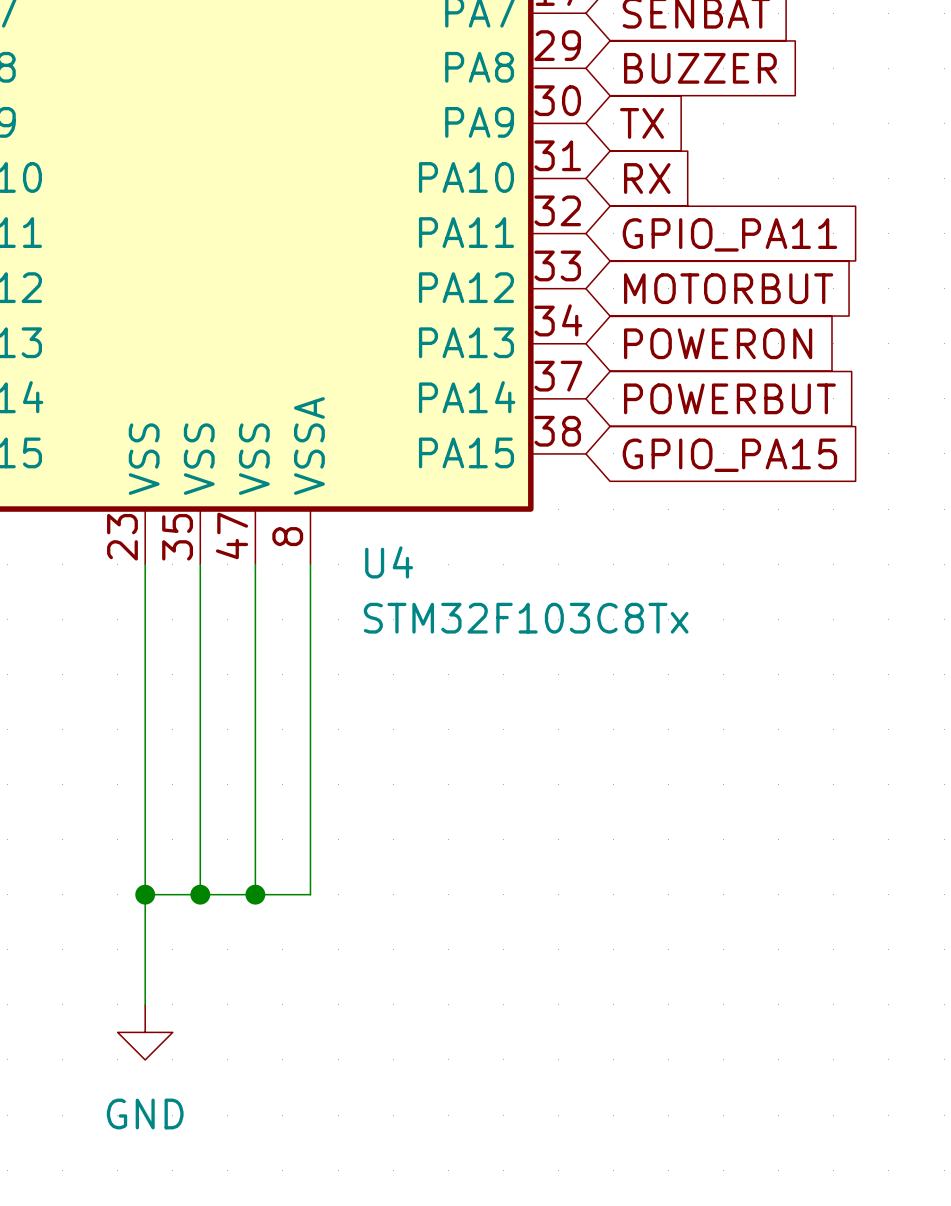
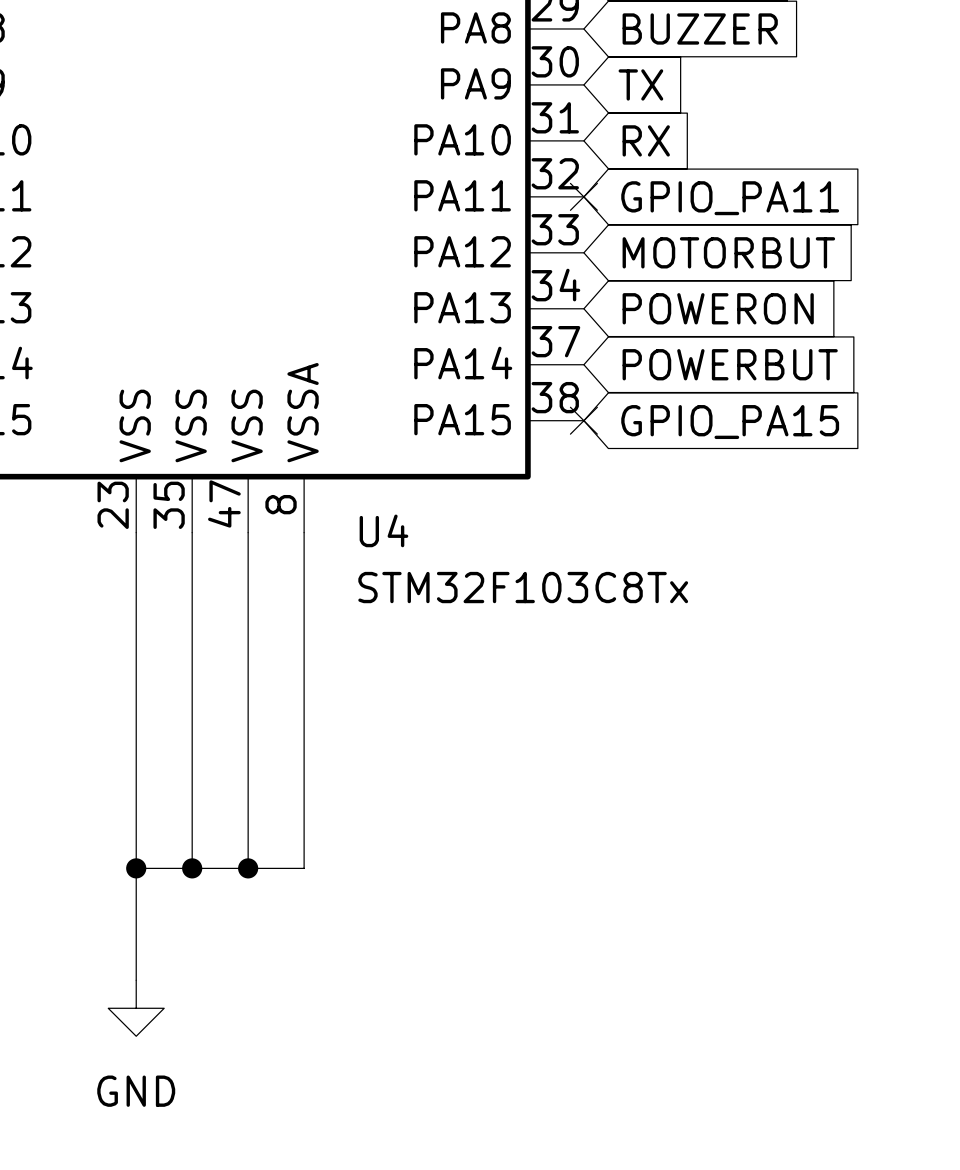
no-connect mark: none -> (583, 196)
no-connect mark: none -> (583, 420)

